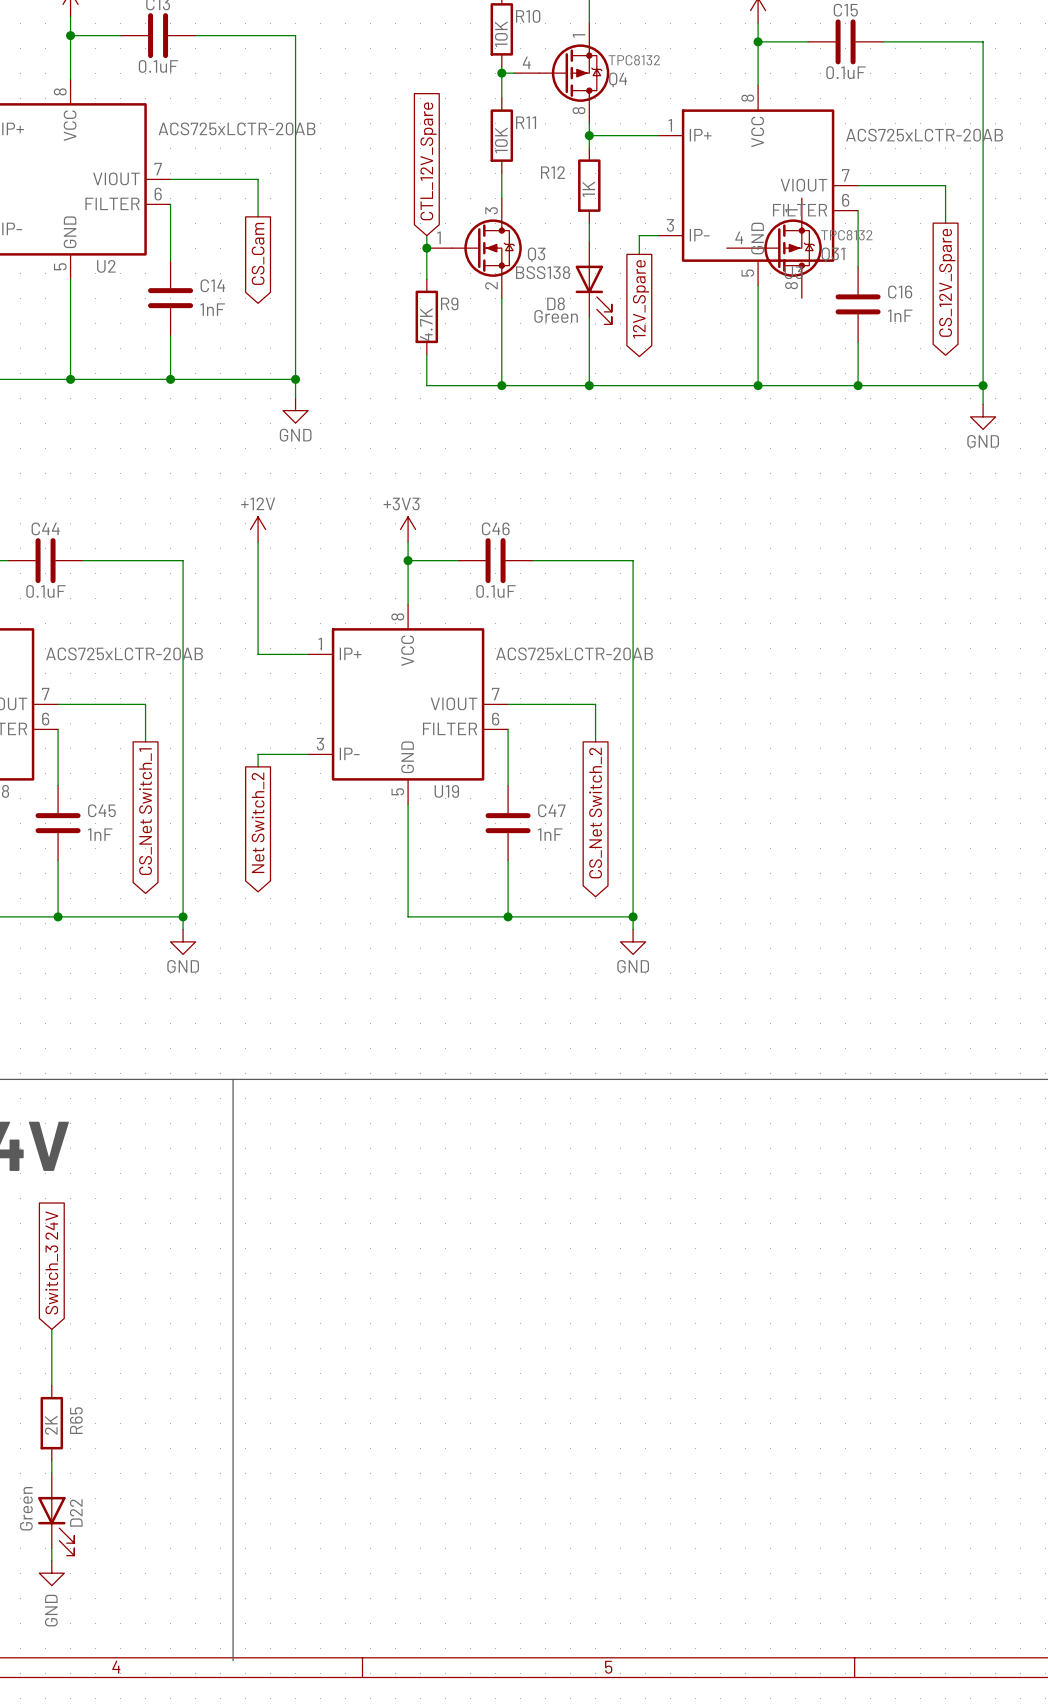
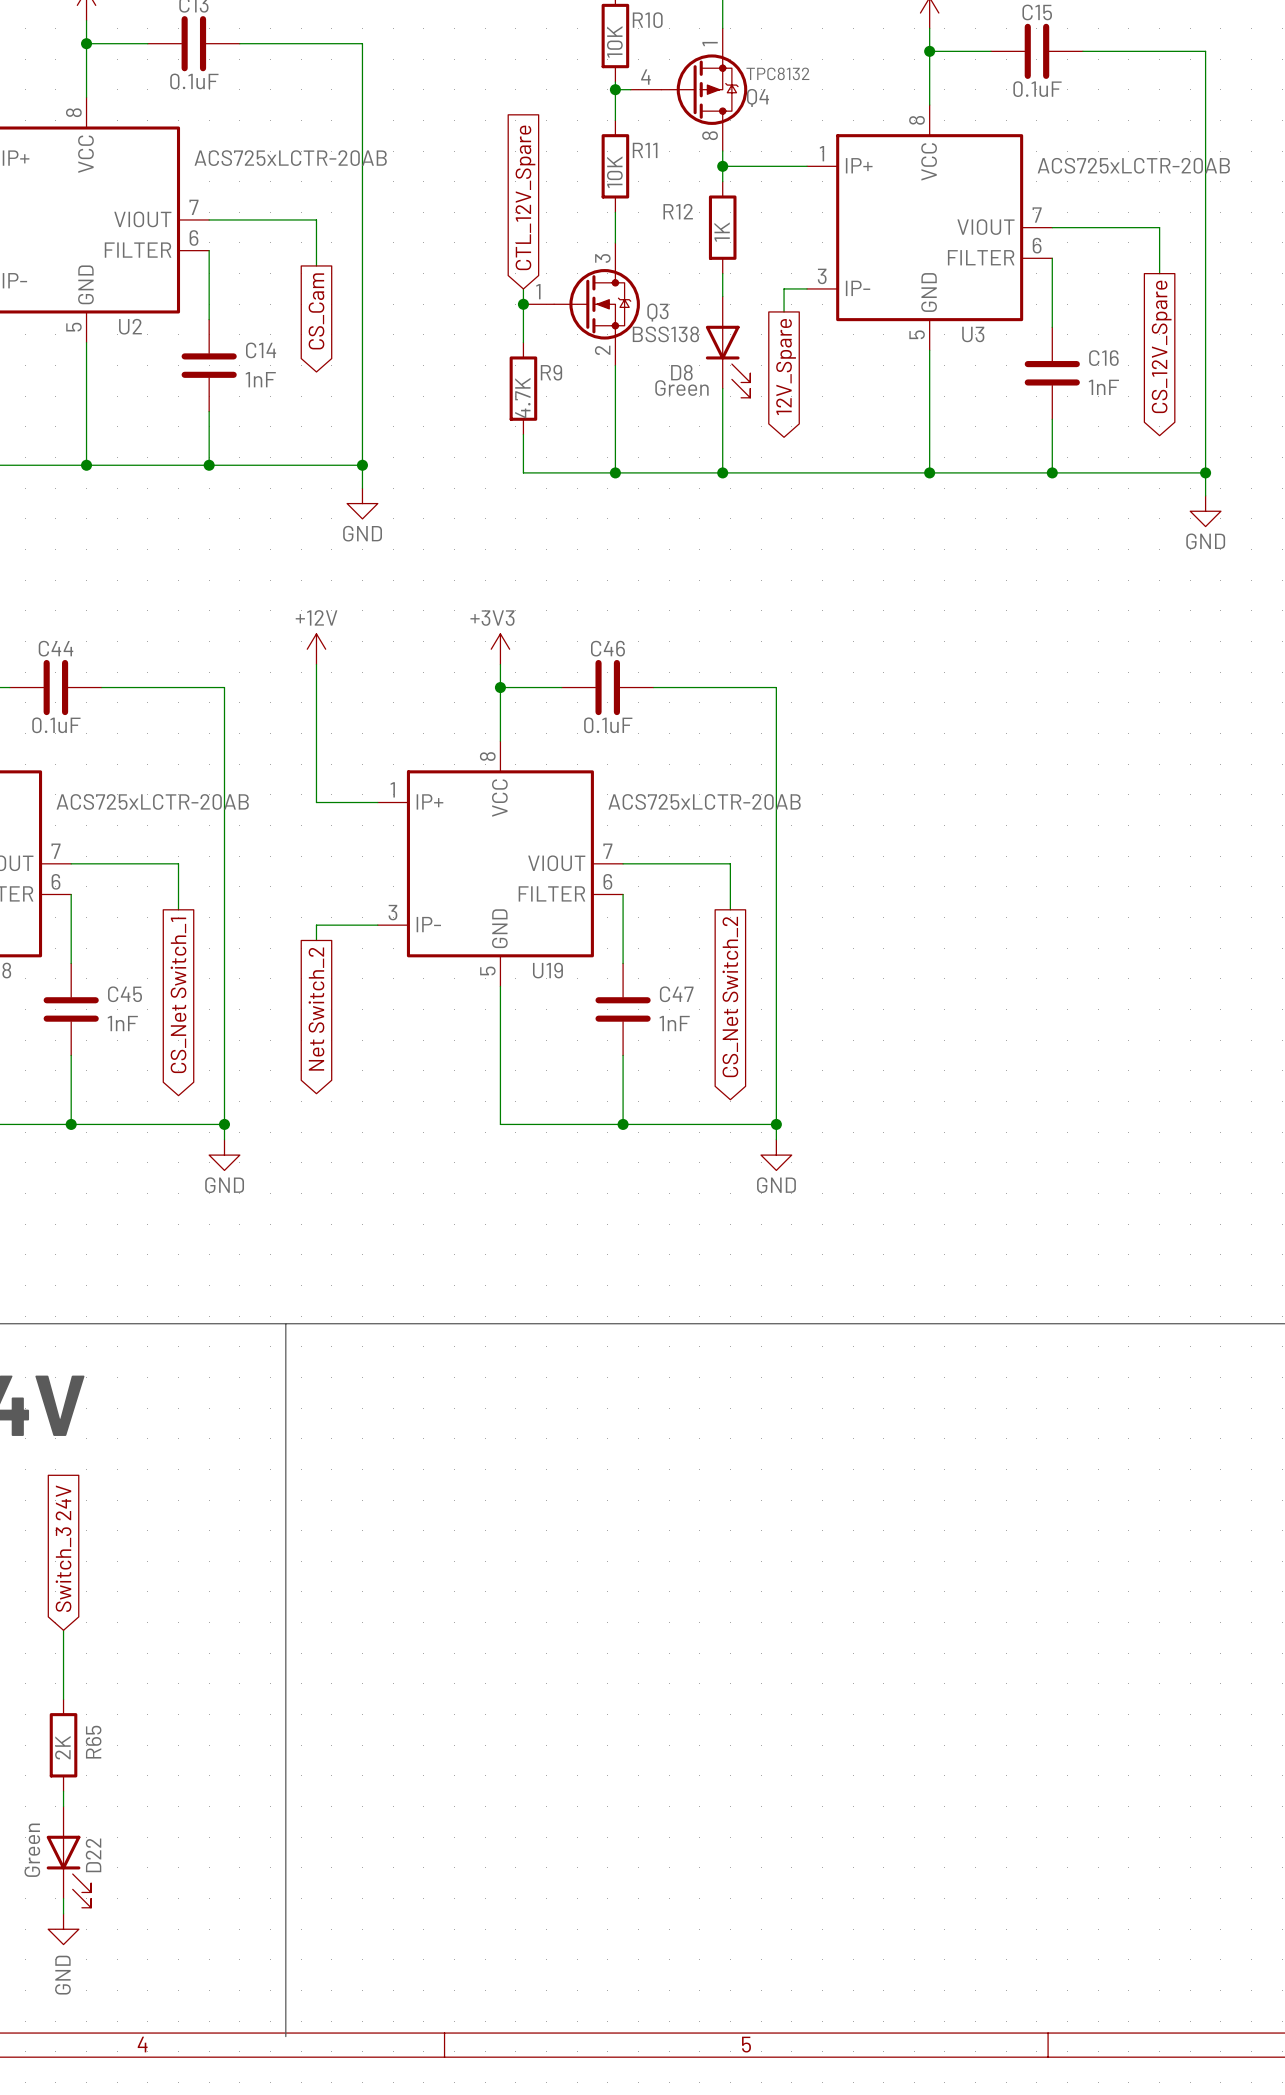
Q31: TPC8132 (774, 248) -> none

